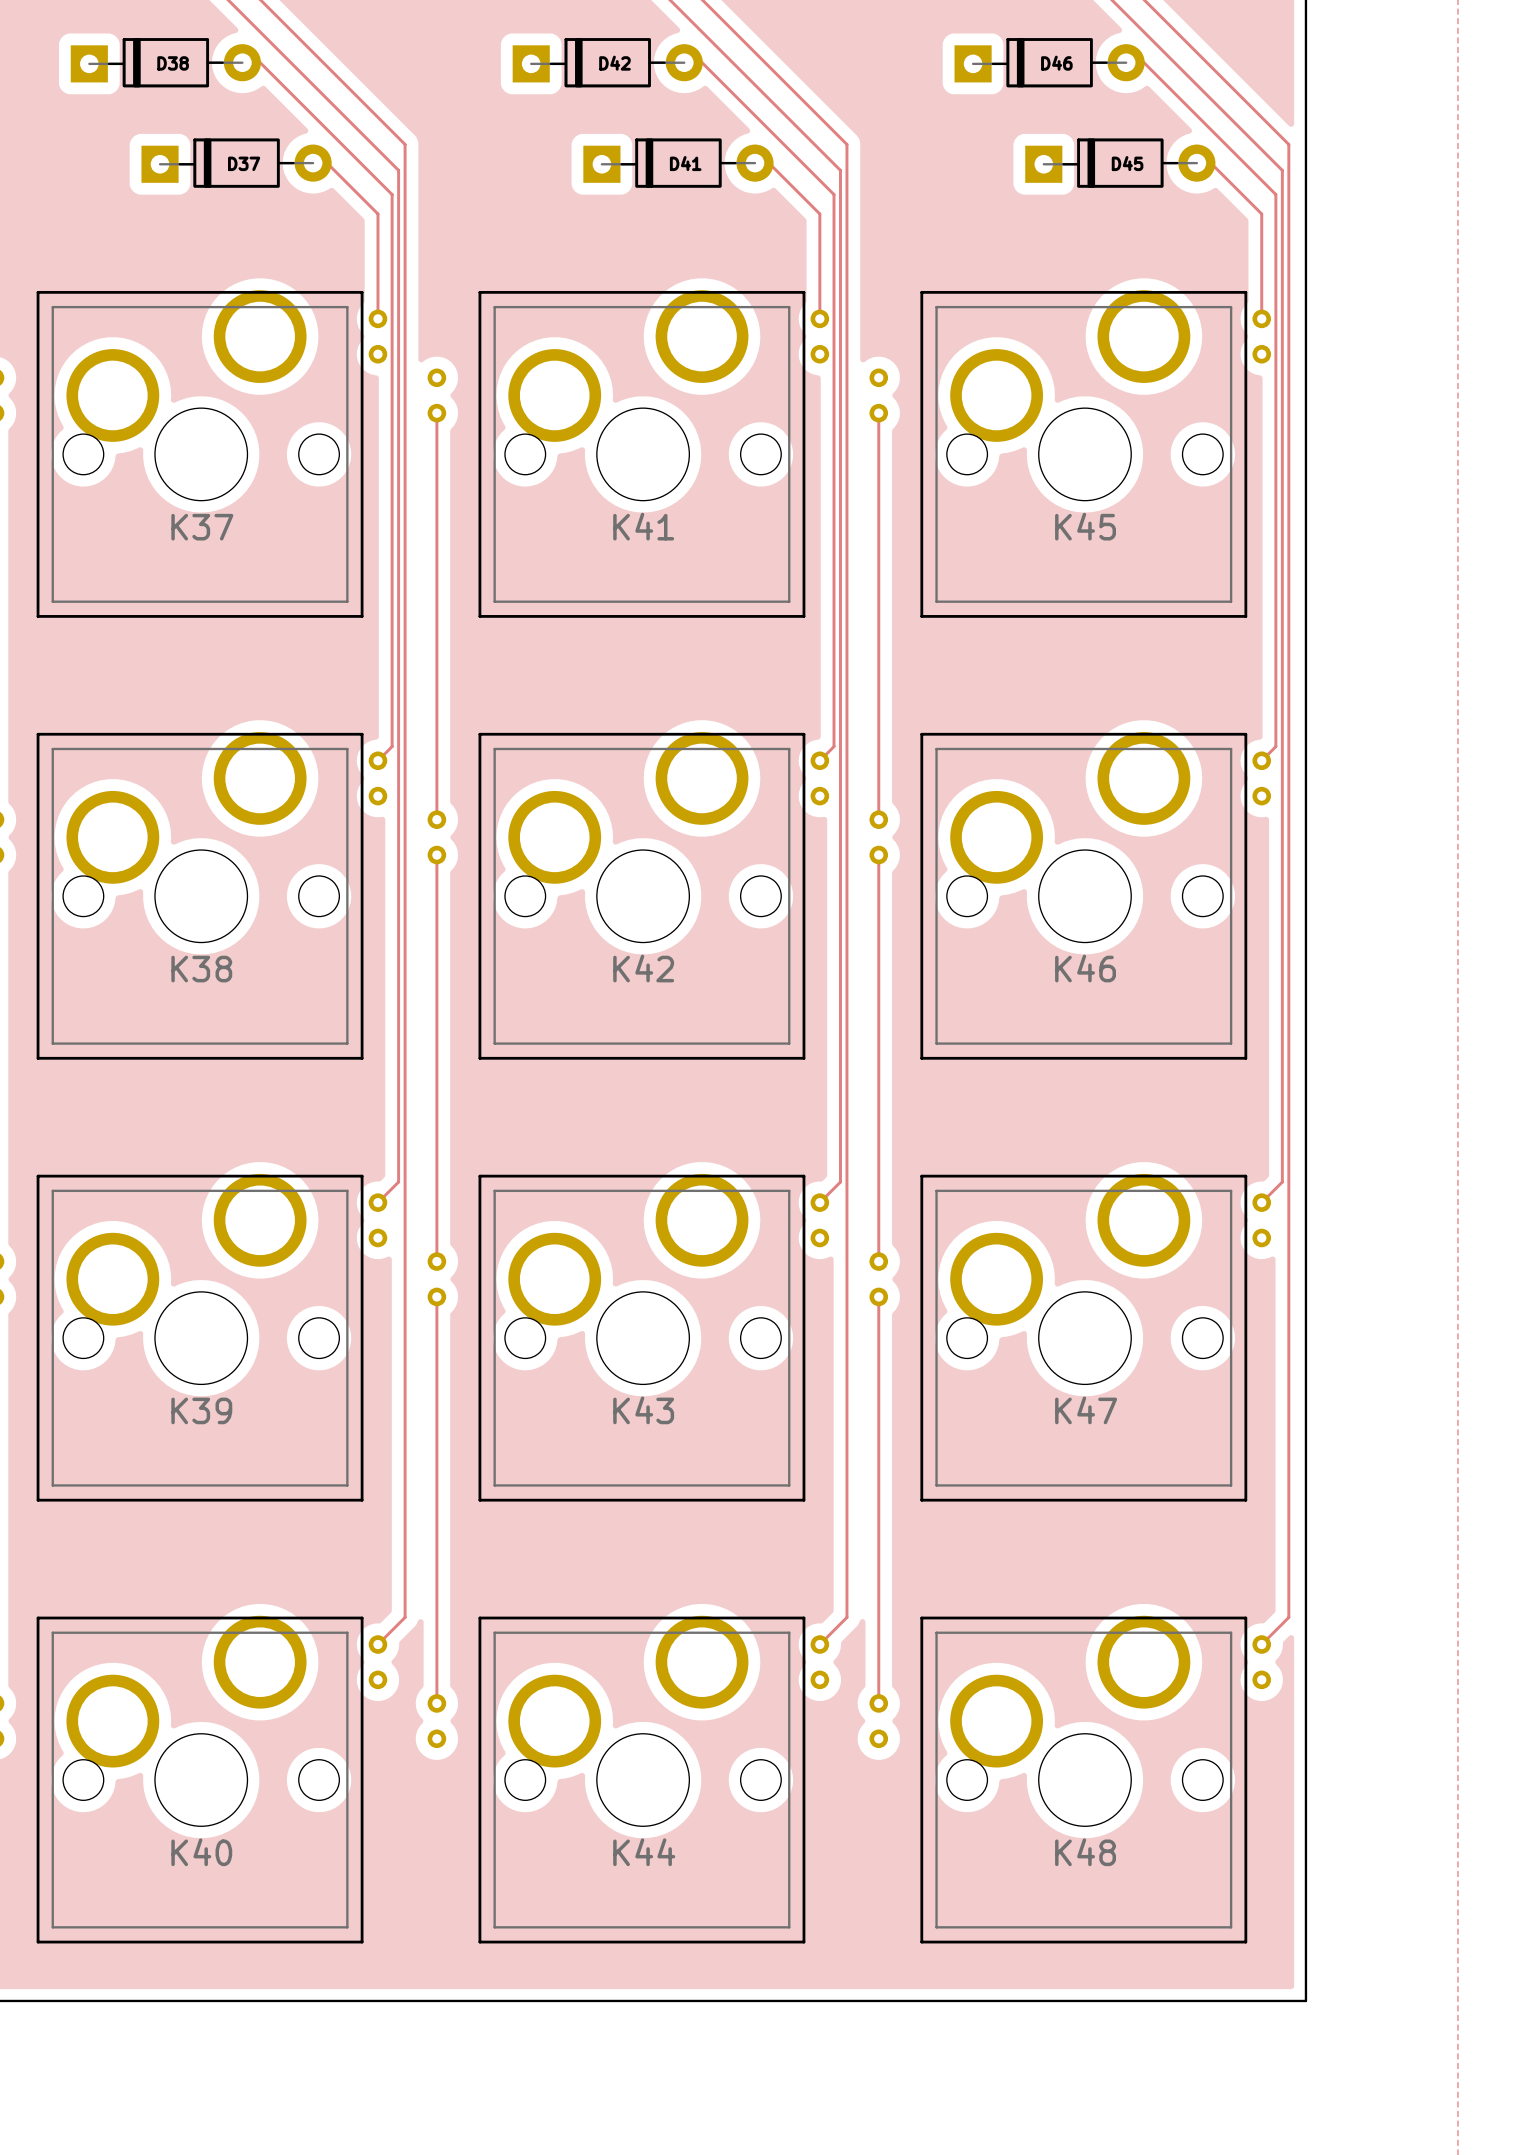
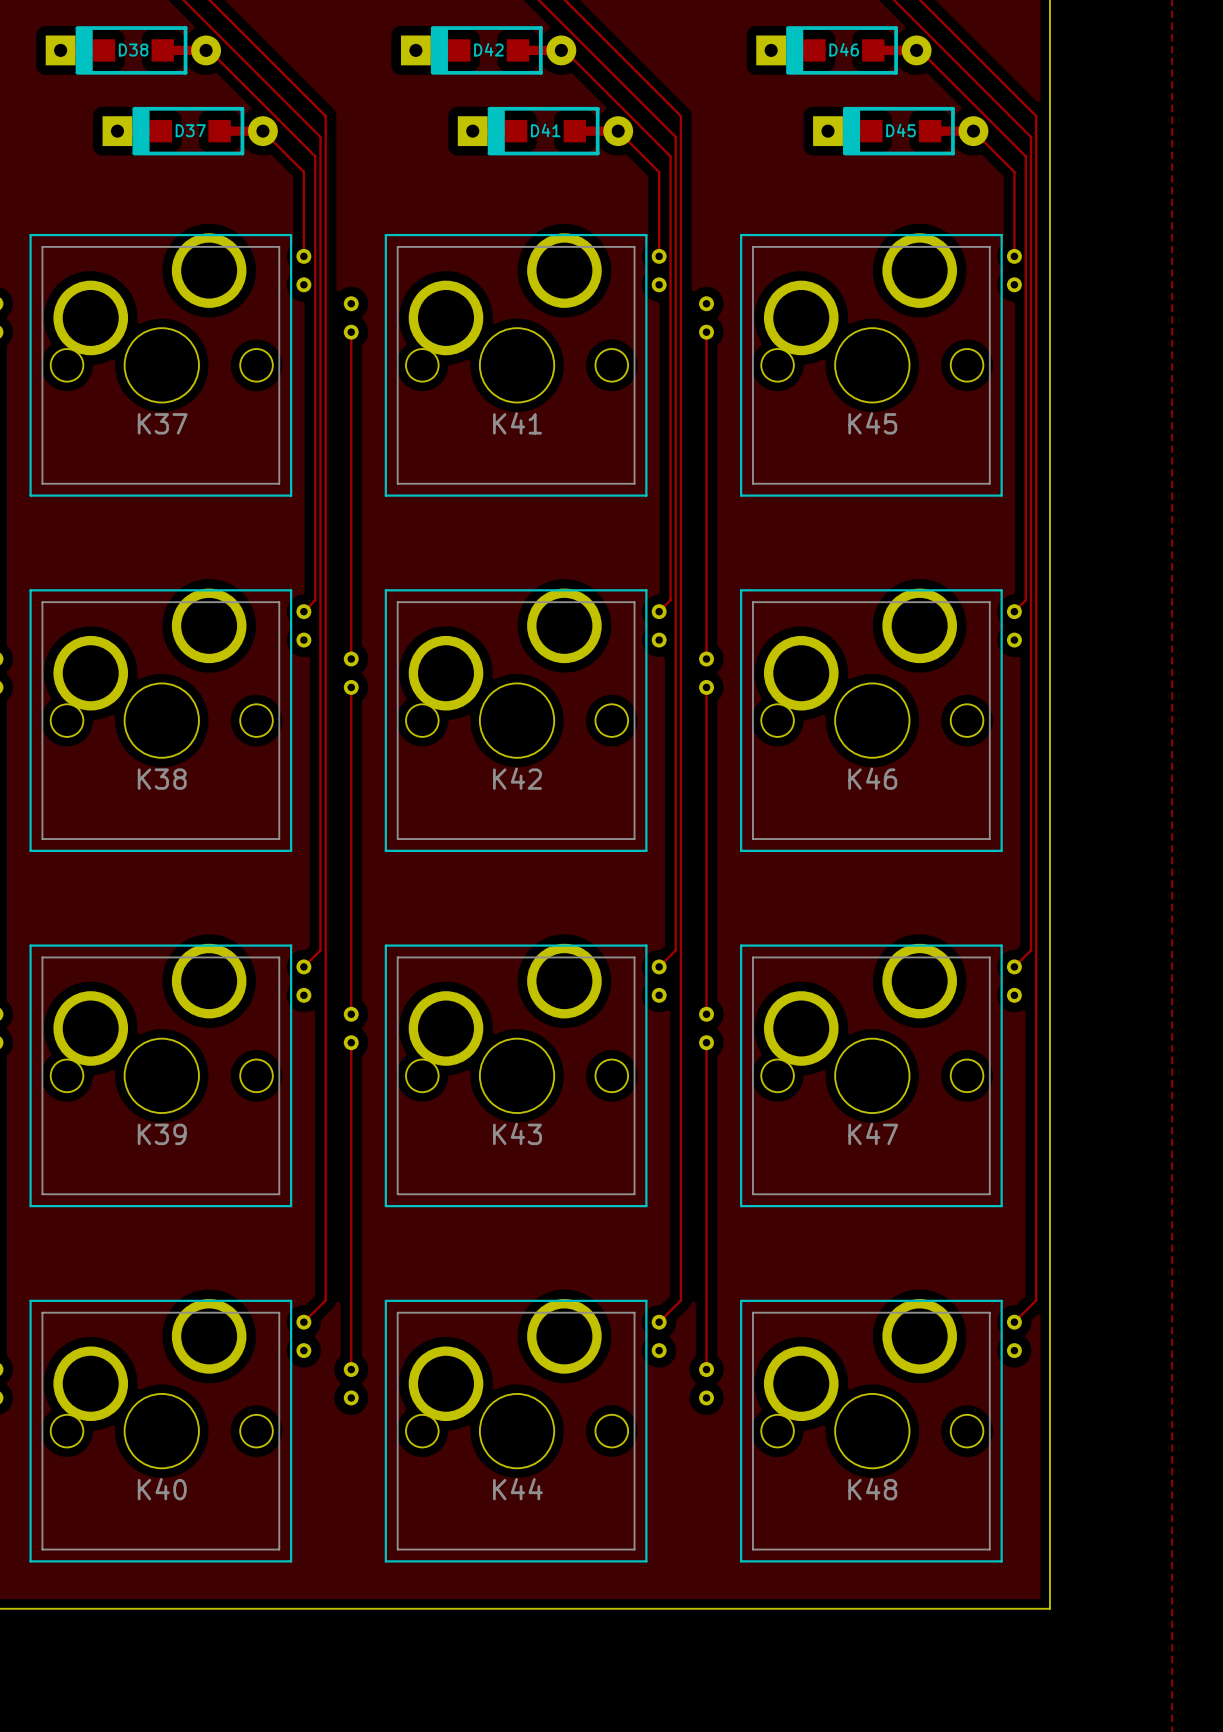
D38 footprint: [70, 38, 261, 88] -> [45, 26, 222, 75]
D42 footprint: [512, 38, 703, 88] -> [400, 26, 577, 75]
D46 footprint: [954, 38, 1145, 88] -> [756, 26, 932, 75]
D37 footprint: [141, 138, 332, 188] -> [102, 106, 278, 156]
D41 footprint: [583, 138, 774, 188] -> [457, 106, 634, 156]
D45 footprint: [1025, 138, 1216, 188] -> [813, 106, 989, 156]

